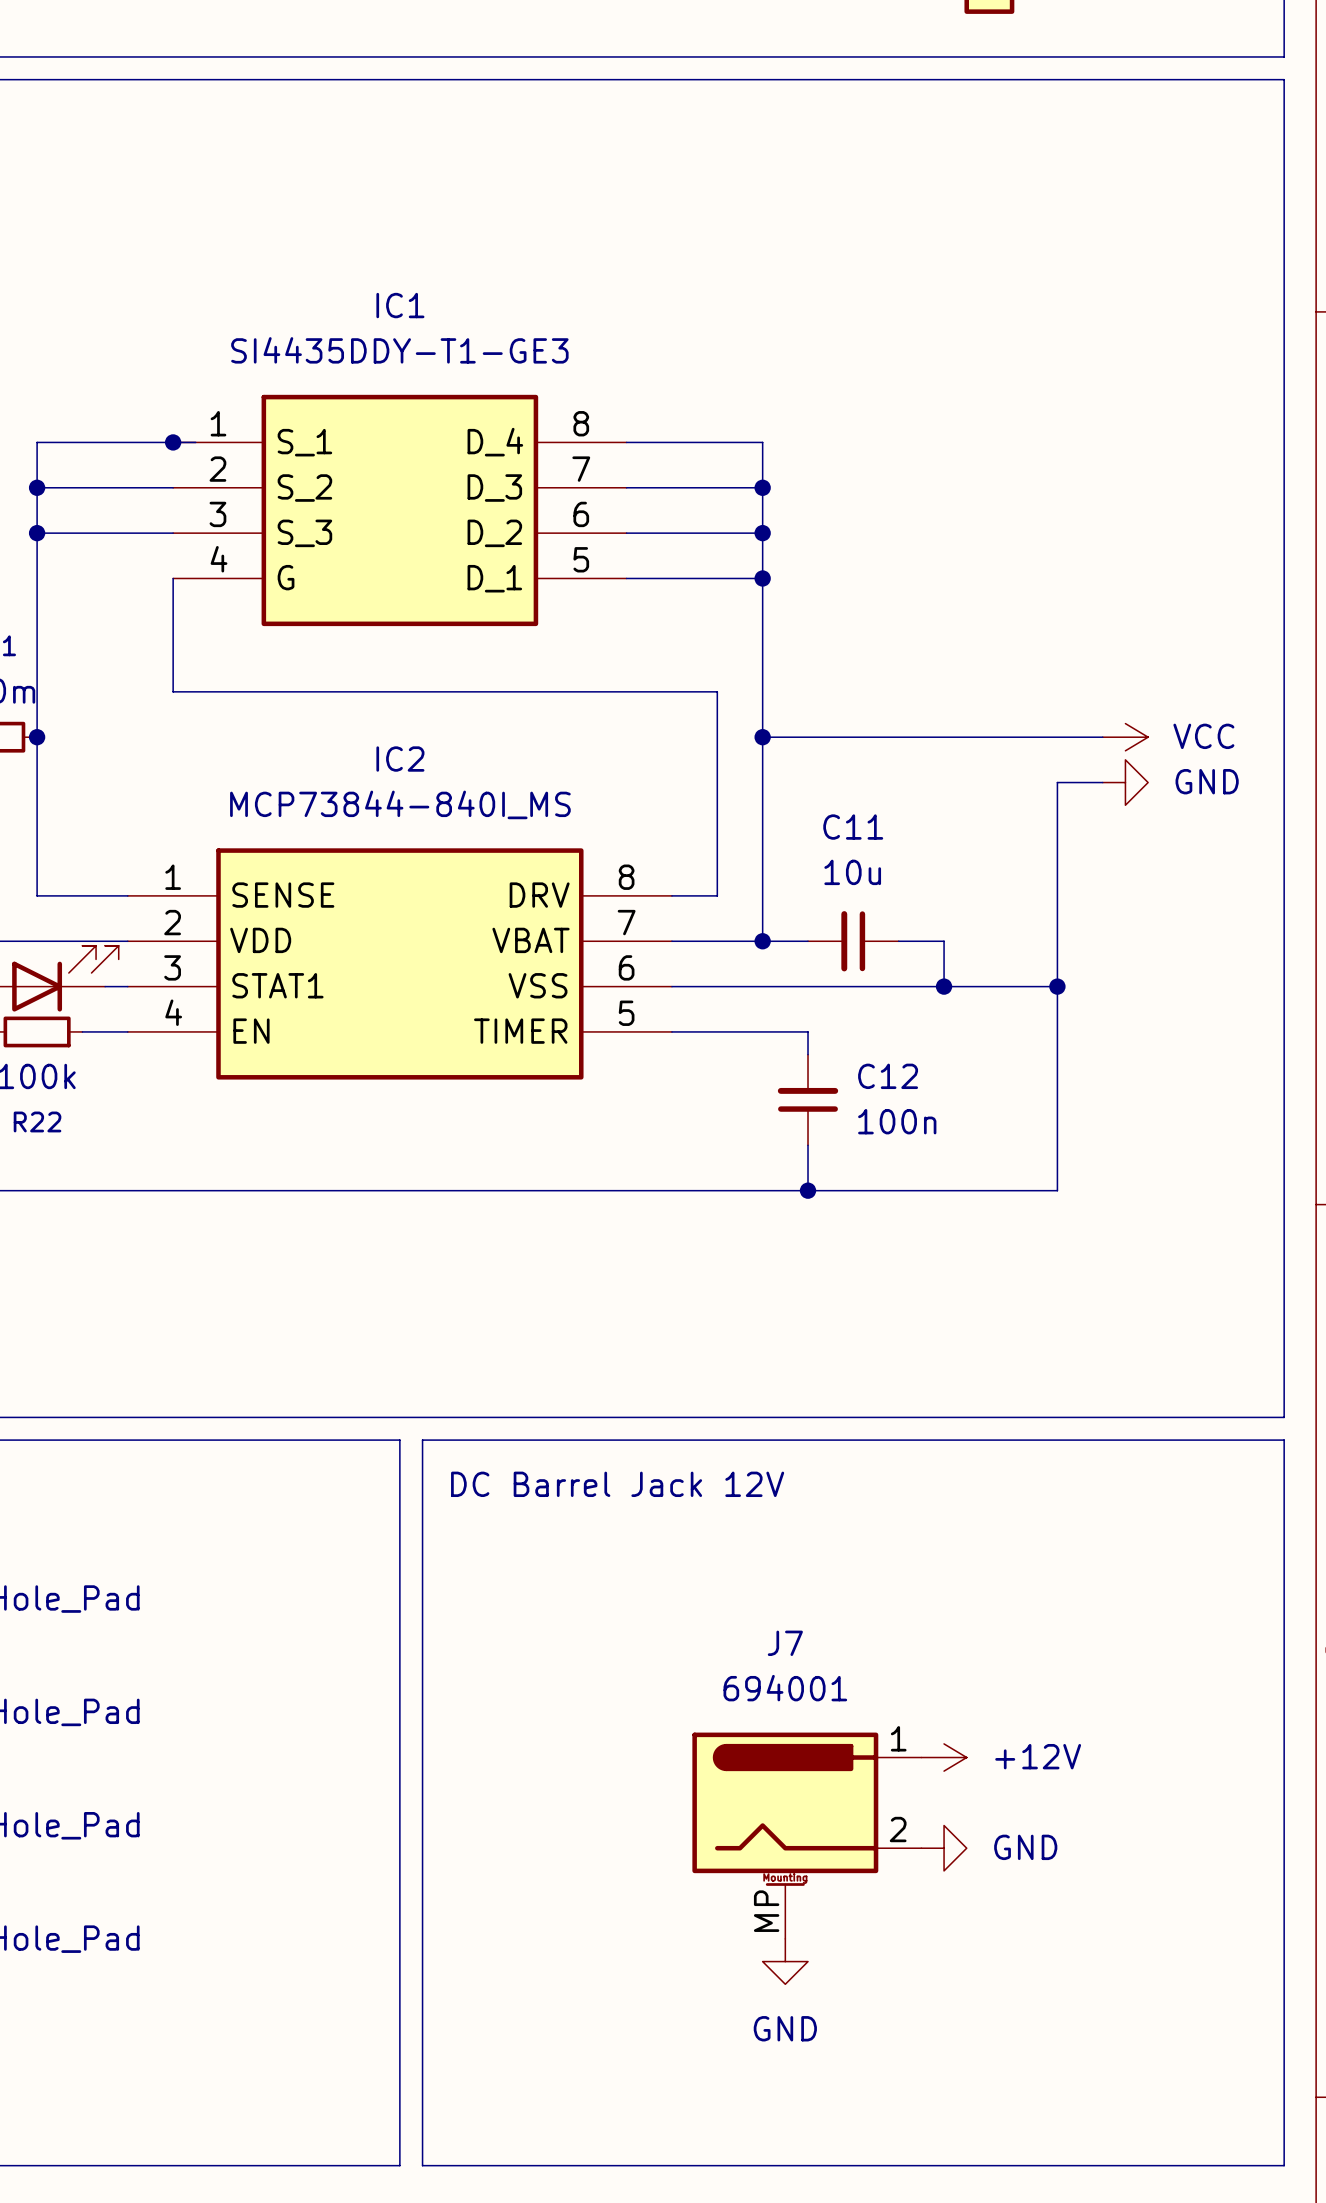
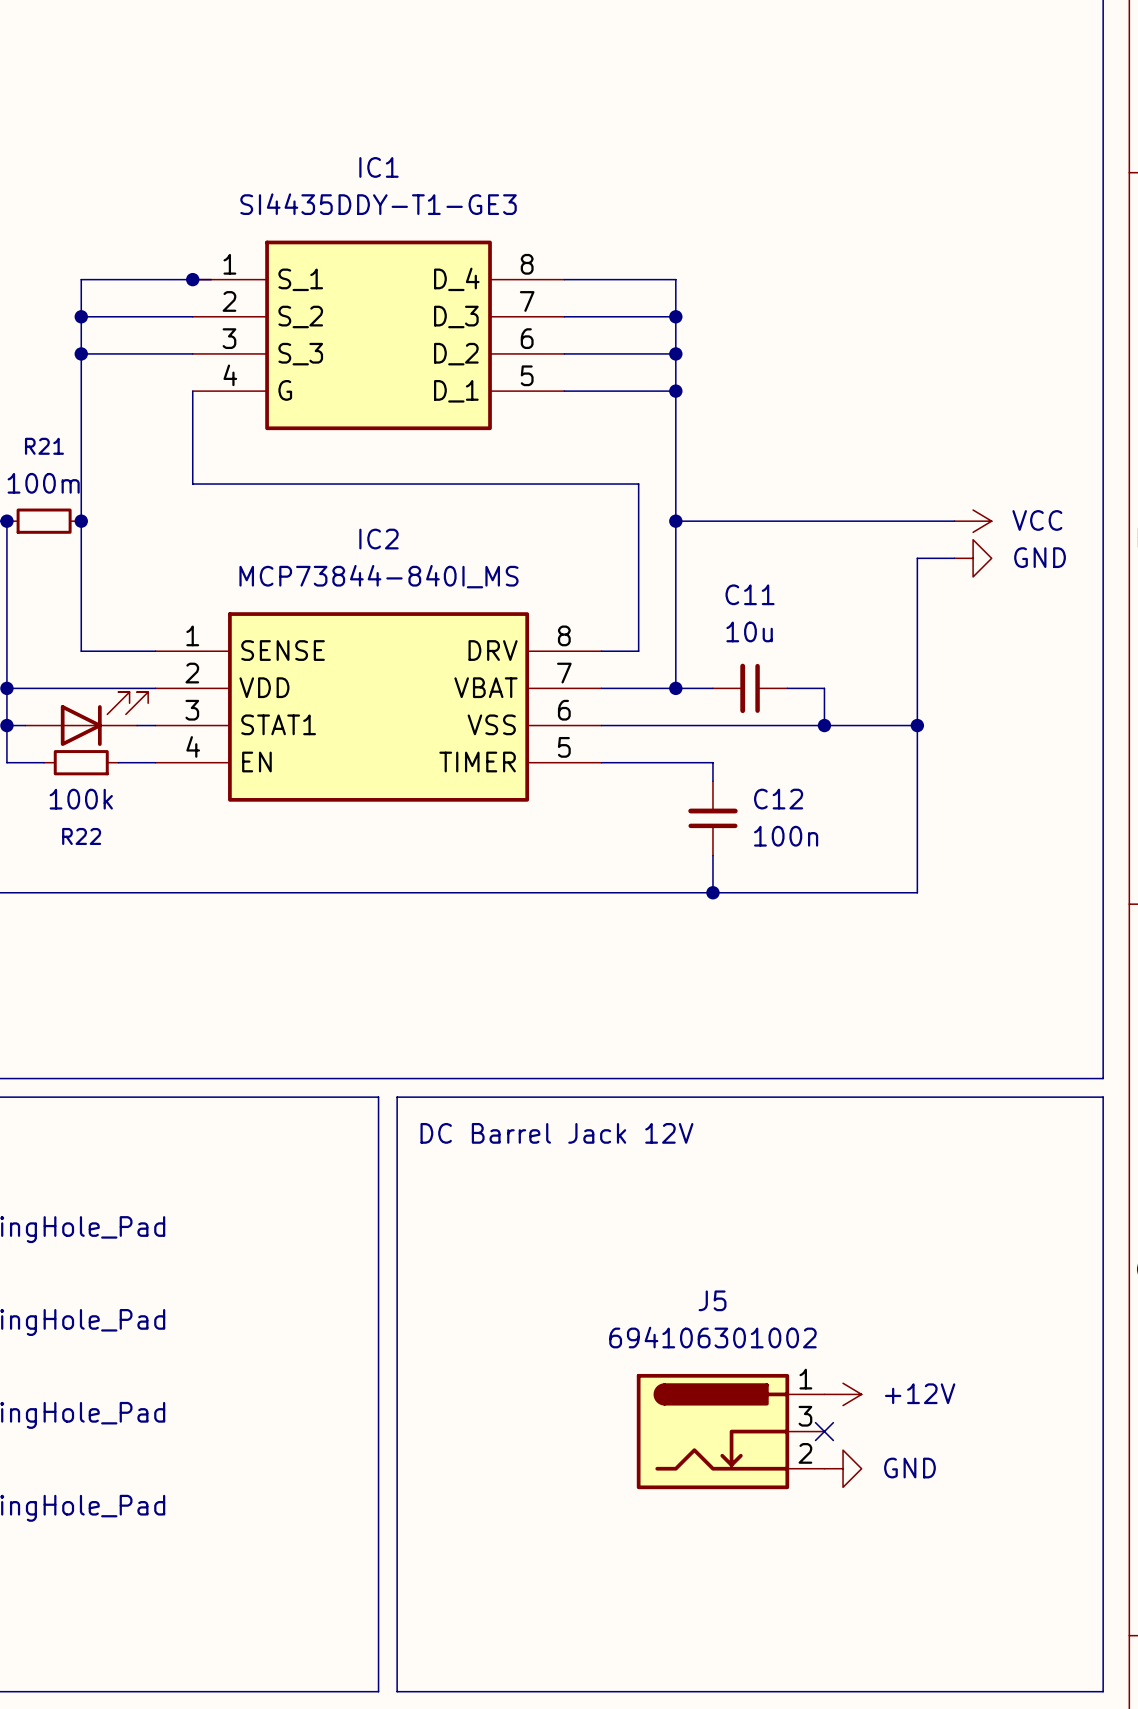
power symbol position: +12V (944, 1757) -> +12V (843, 1394)
J7: 694001 (806, 1835) -> none
J5: none -> 694106301002 (730, 1431)
power symbol position: GND (944, 1848) -> GND (843, 1468)
no-connect mark: none -> (824, 1431)
power symbol: GND (785, 1961) -> none

